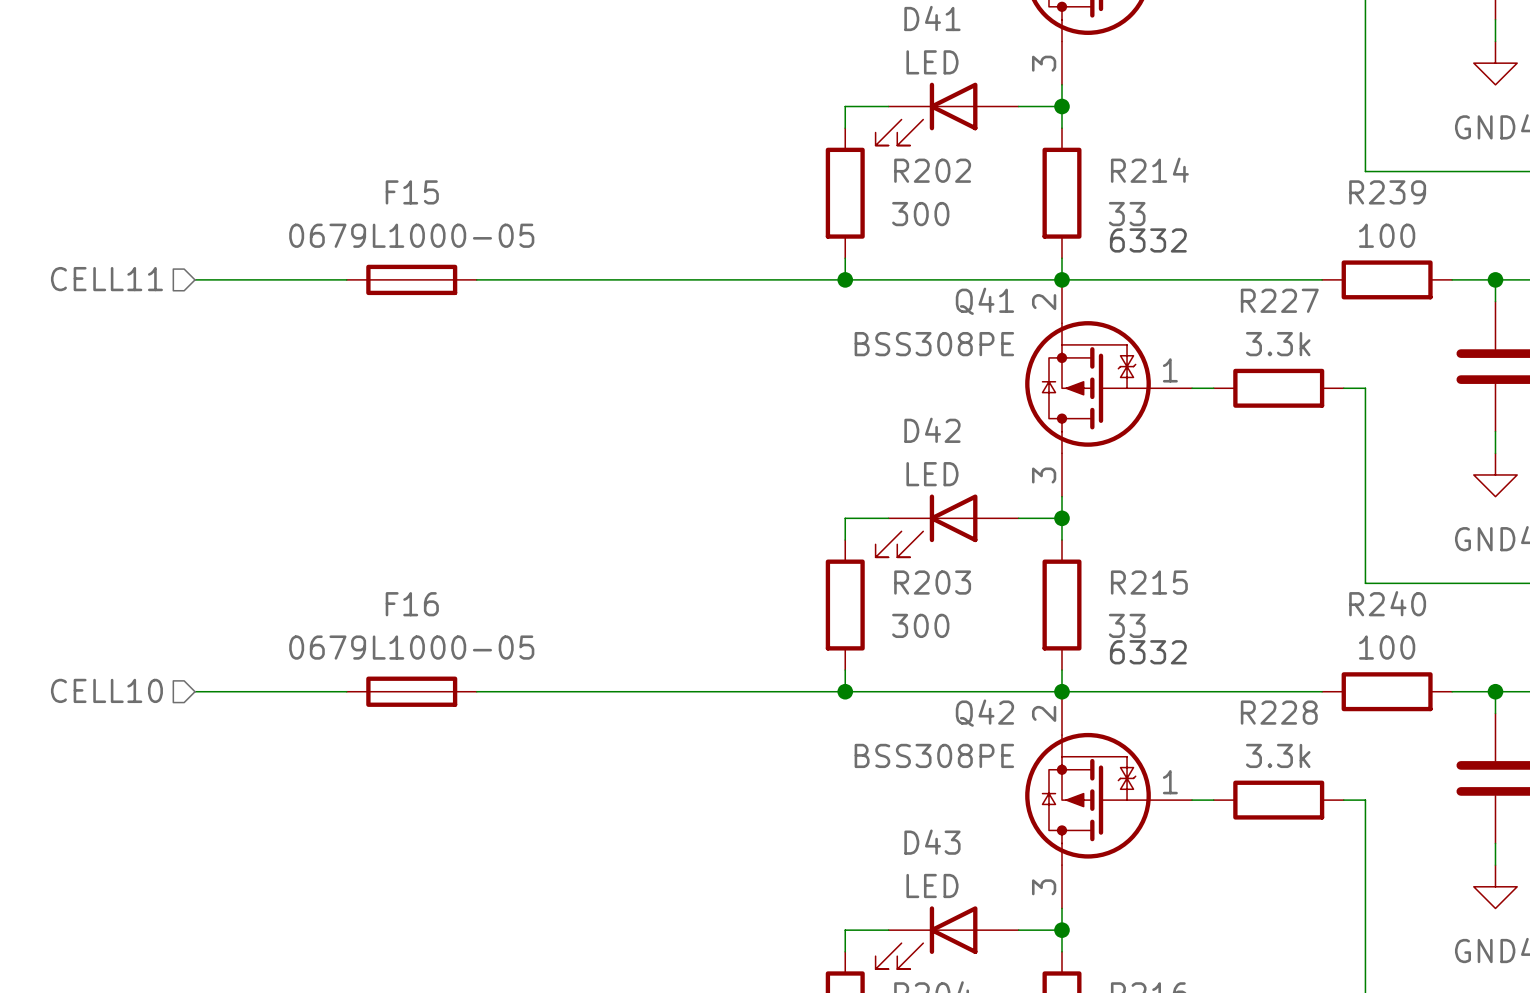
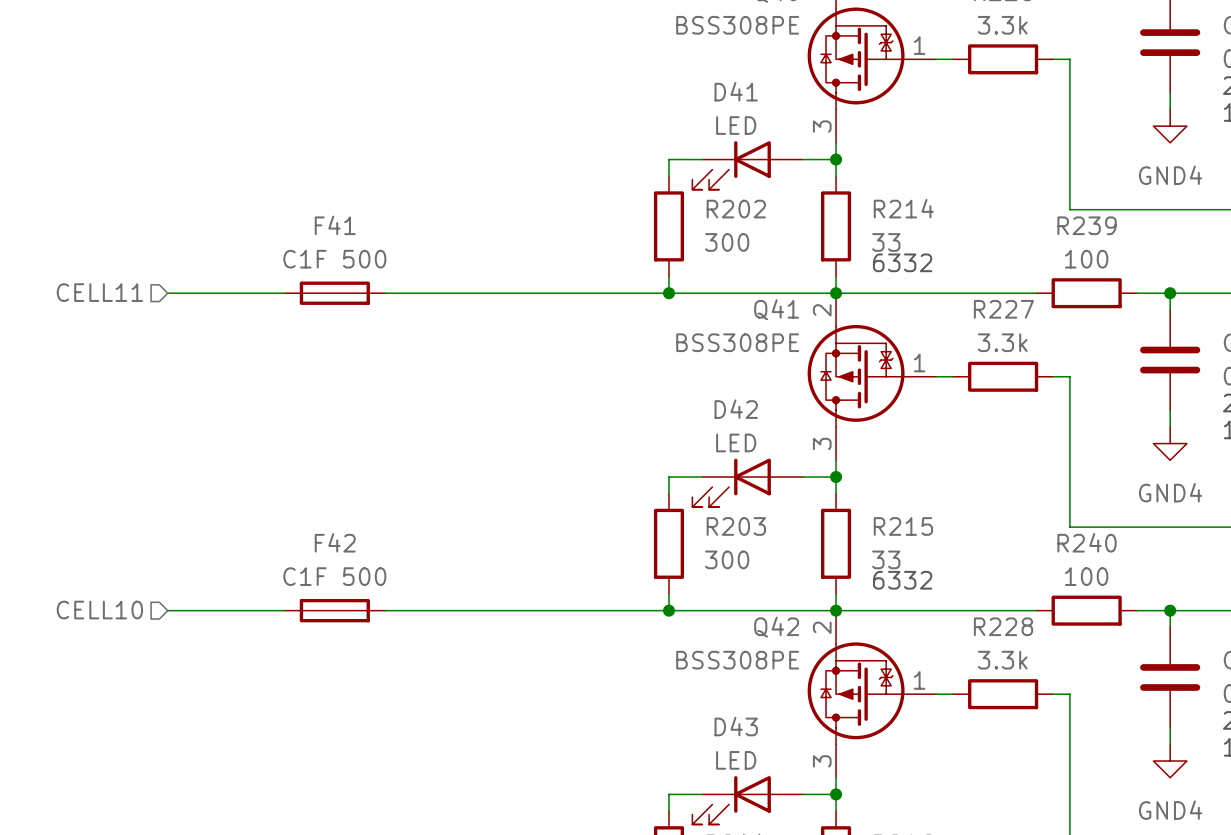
F15 name: F15 (412, 192) -> F41 (335, 225)
F15 value: 0679L1000-05 (411, 235) -> C1F 500 (334, 259)
F16 name: F16 (412, 604) -> F42 (335, 542)
F16 value: 0679L1000-05 (411, 647) -> C1F 500 (334, 576)

